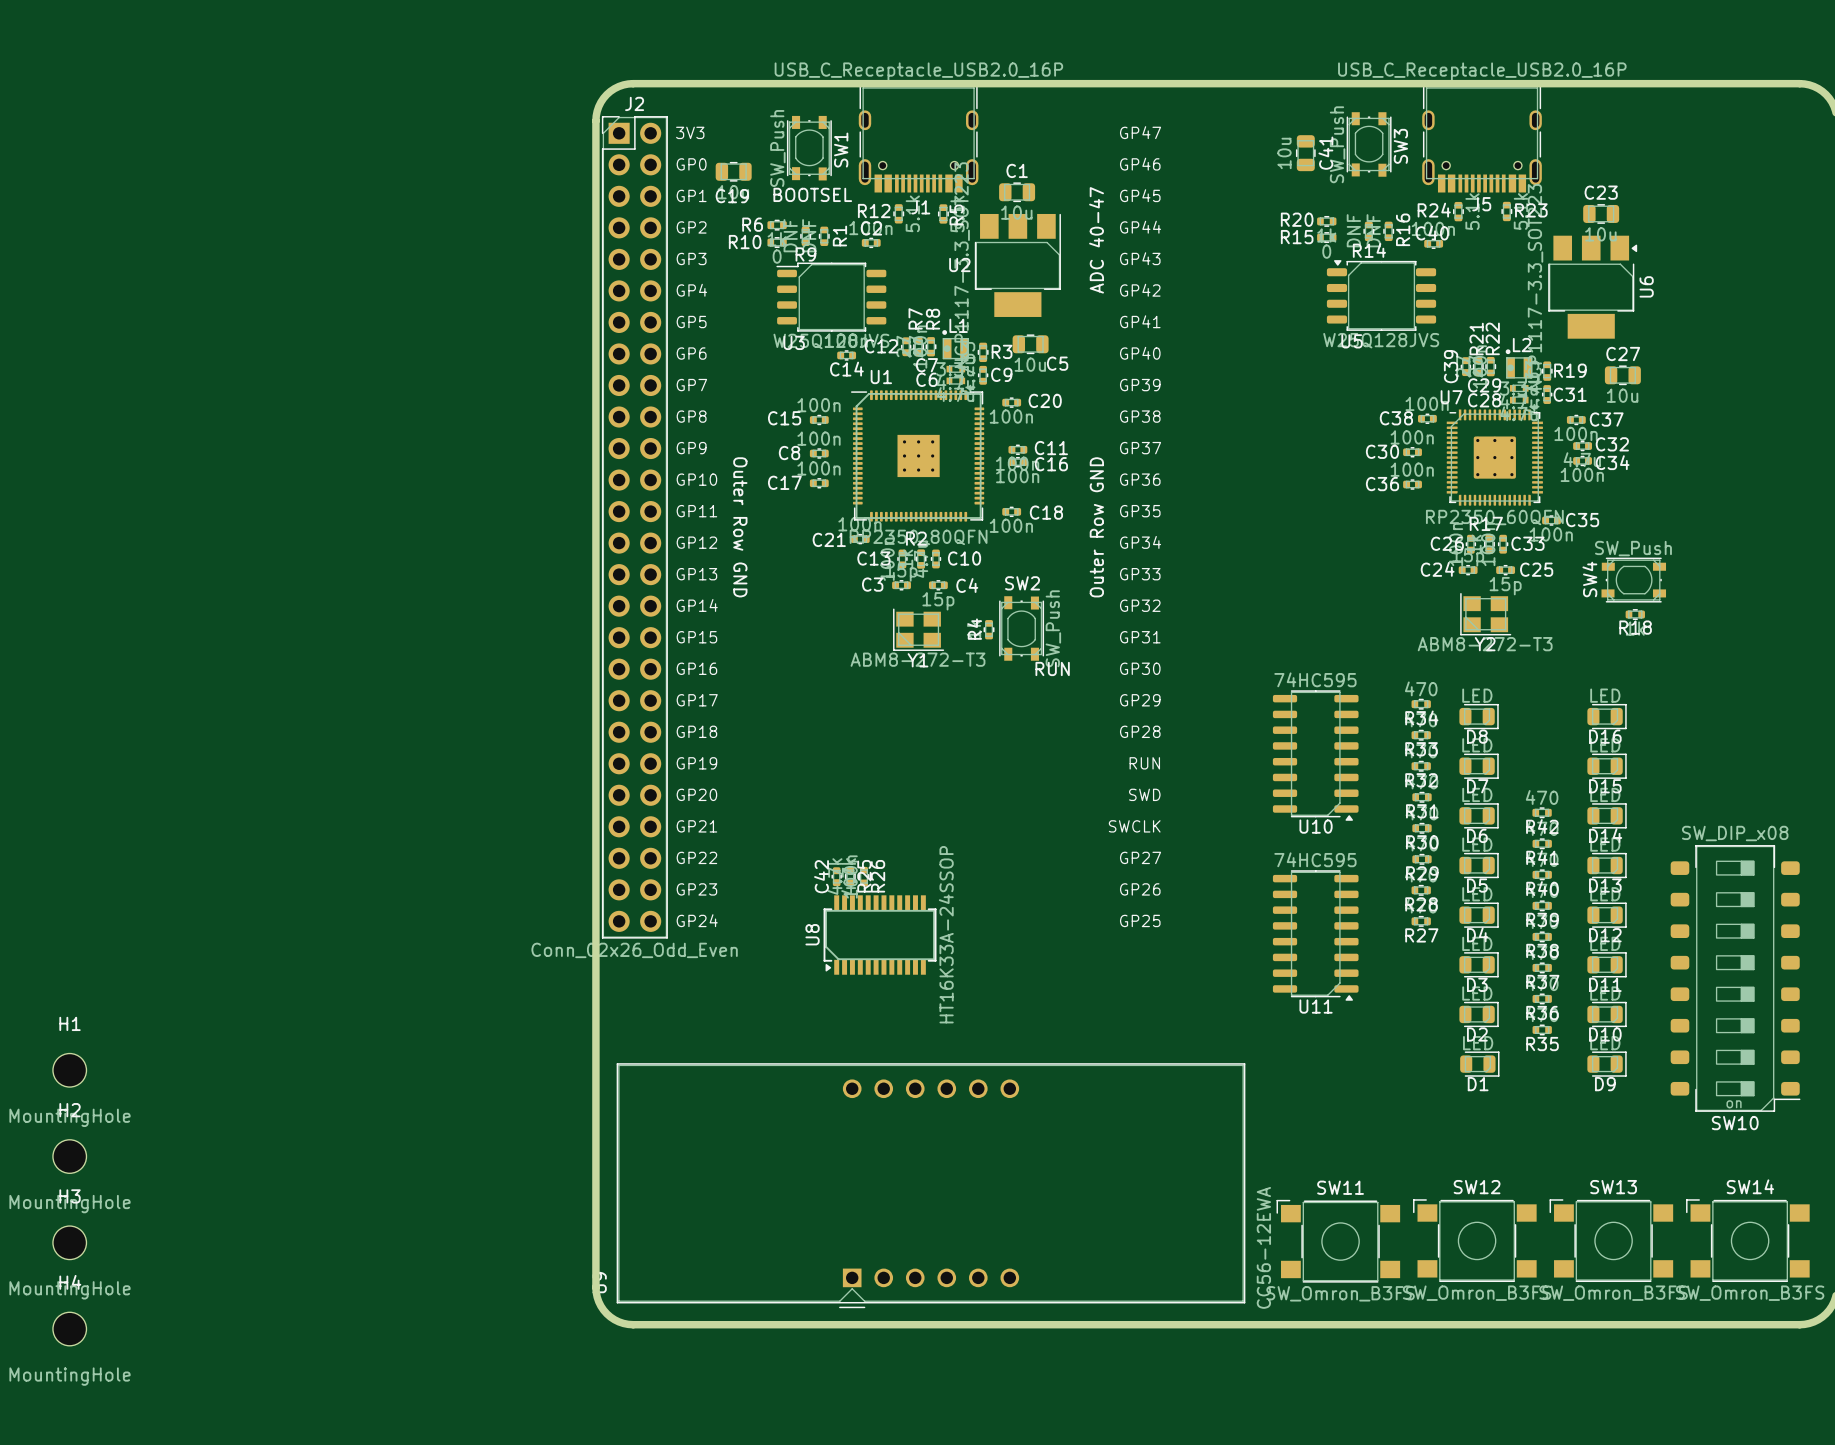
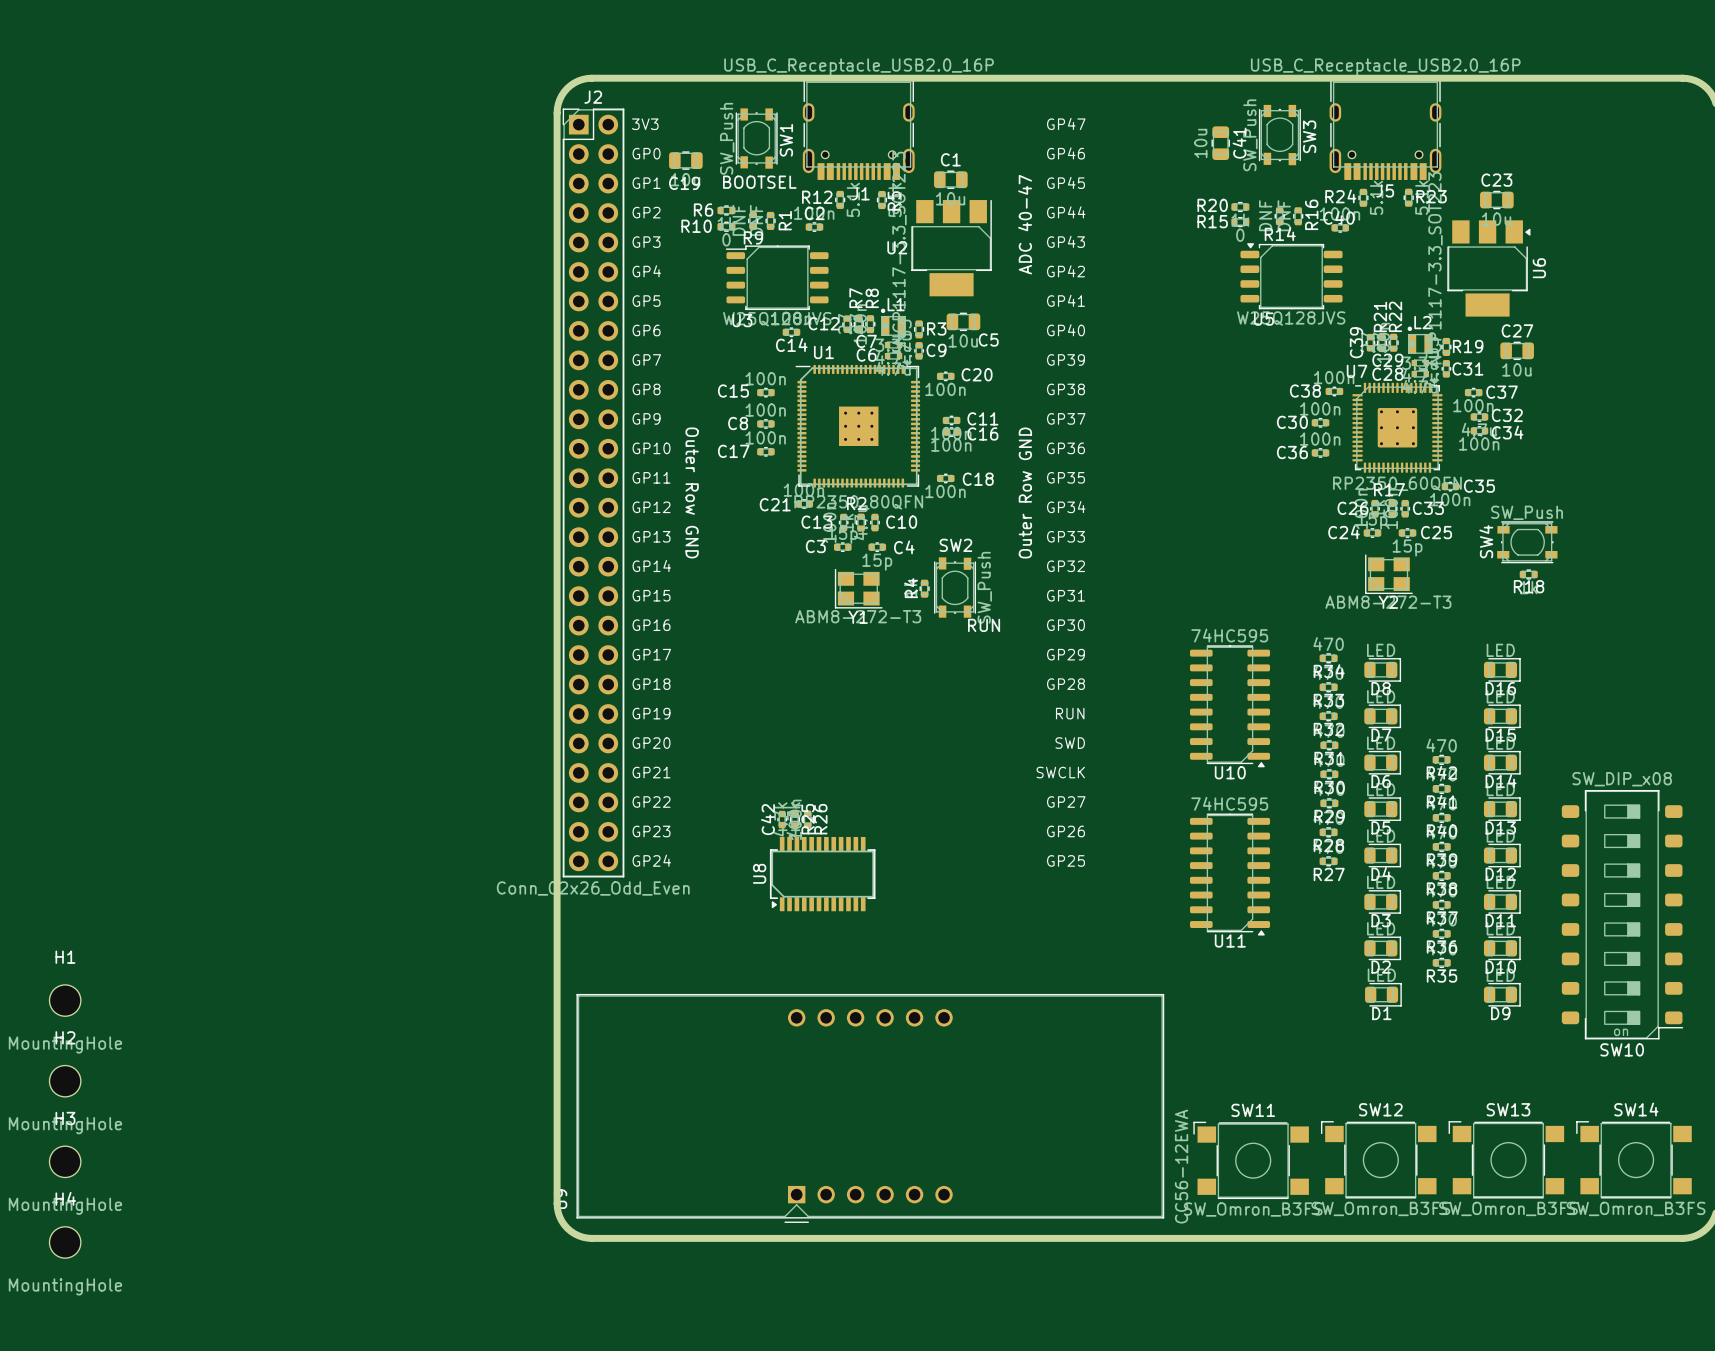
U8 value: HT16K33A-24SSOP (946, 934) -> none

